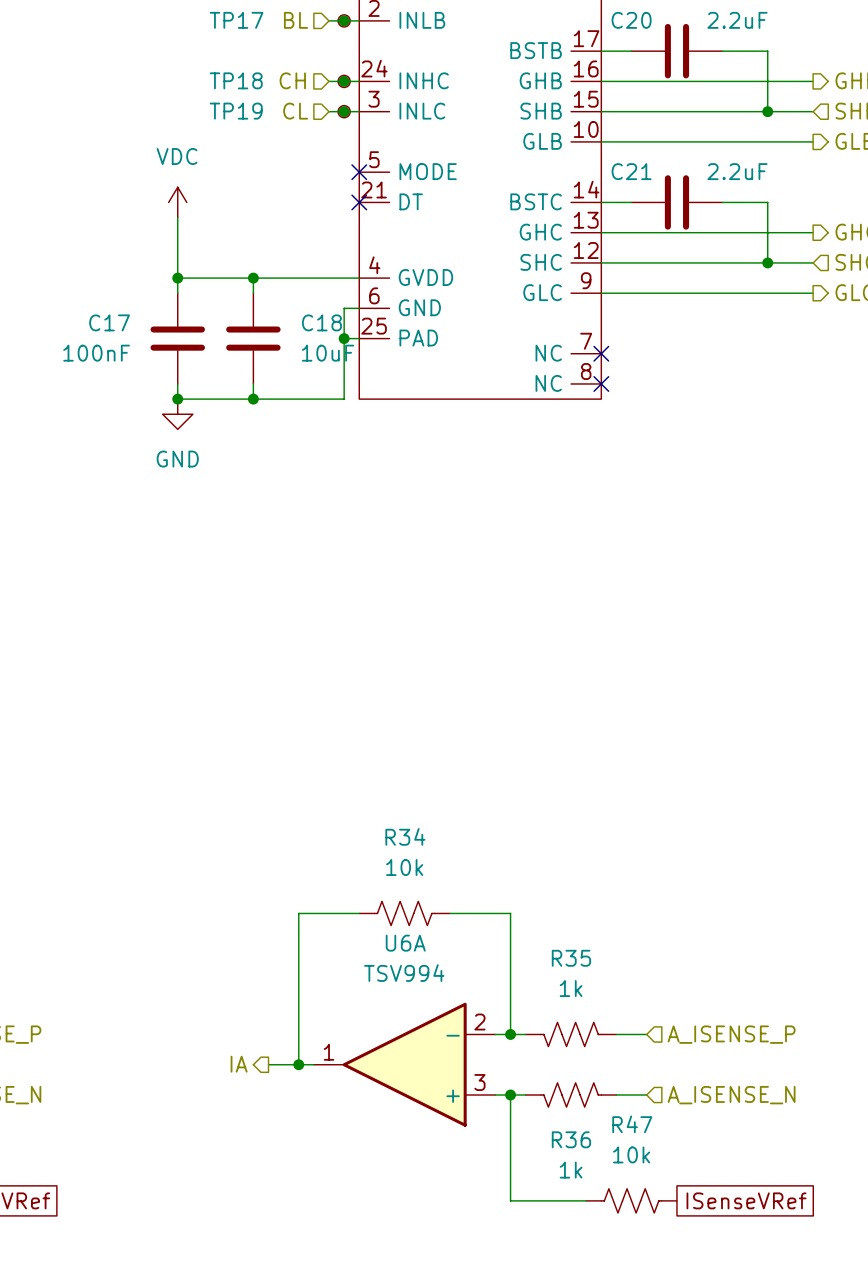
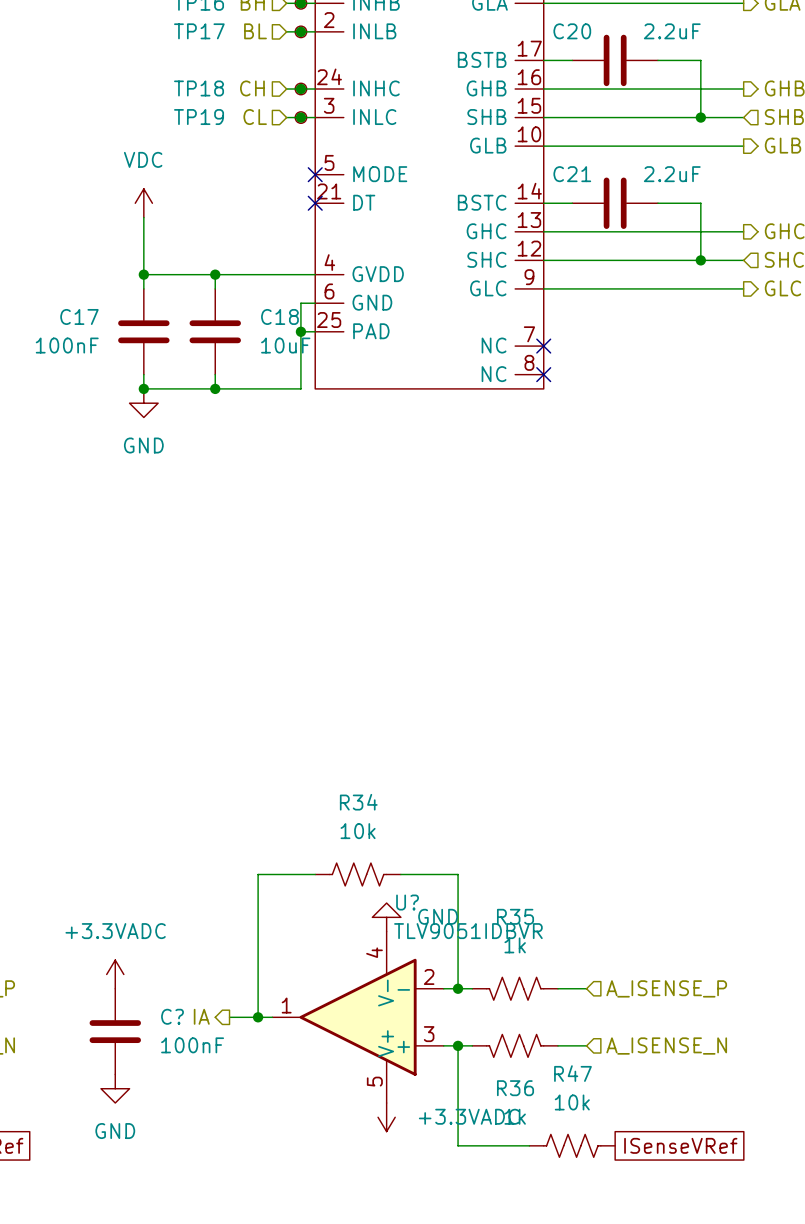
power symbol: none -> GND (386, 917)
power symbol: none -> +3.3VADC (115, 974)
U6A: TSV994 (404, 1064) -> none
U?: none -> TLV9051IDBVR (358, 1017)
C?: none -> 100nF (115, 1031)
power symbol: none -> GND (115, 1088)
power symbol: none -> +3.3VADC (386, 1117)

